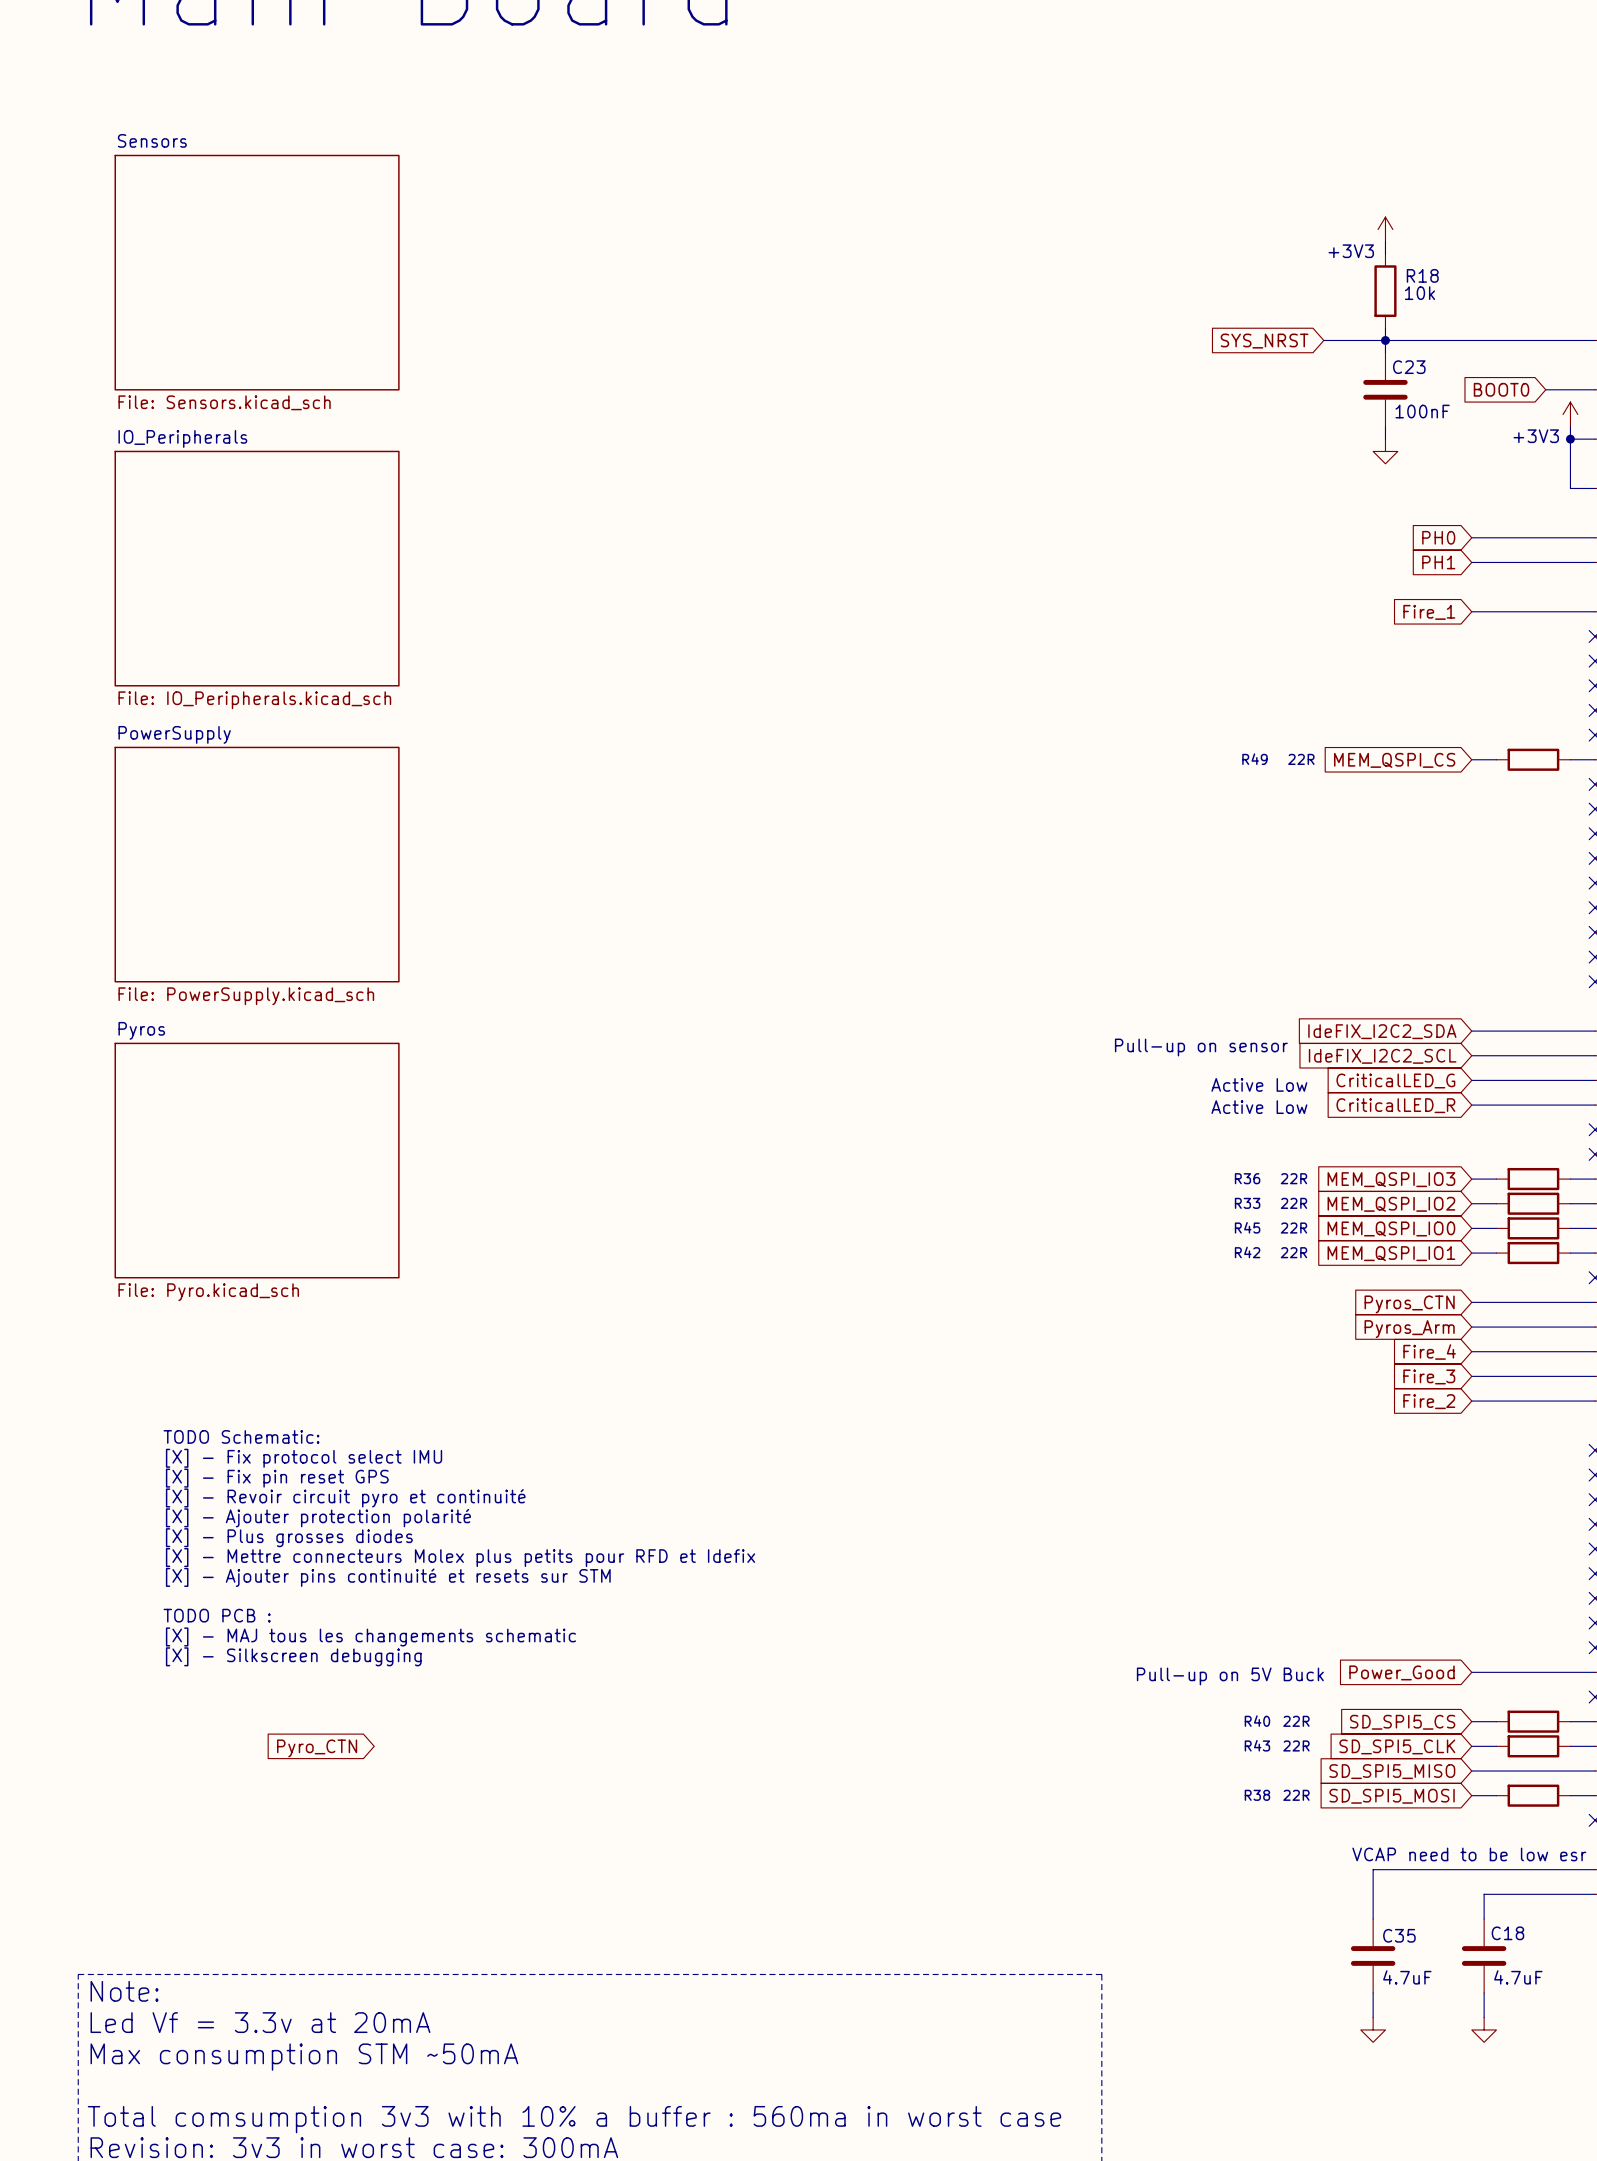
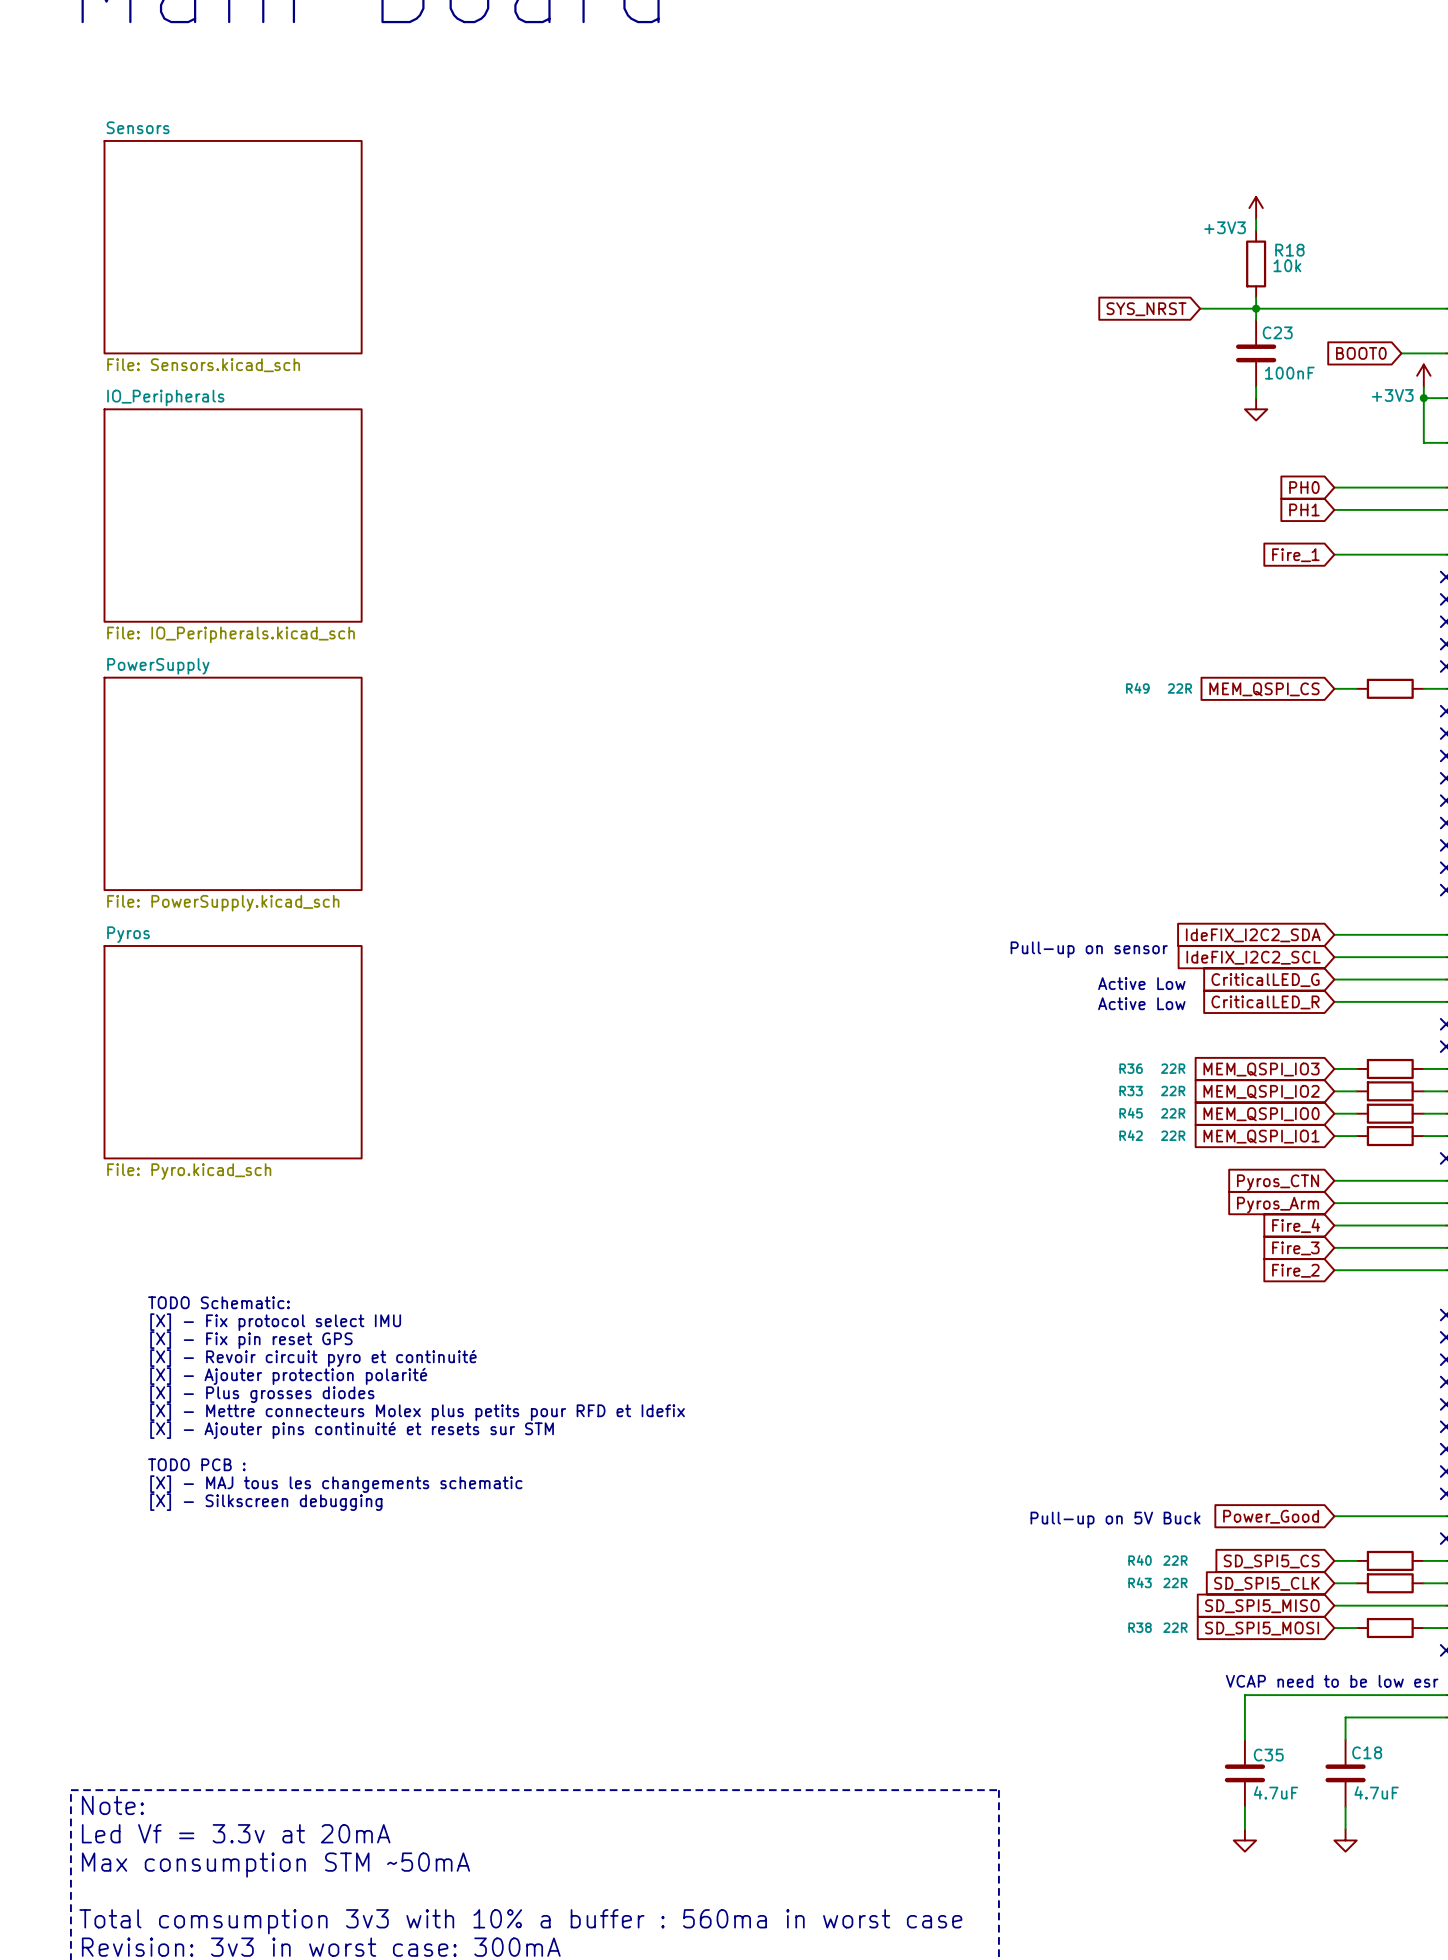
global label: Pyro_CTN (317, 1748) -> none

